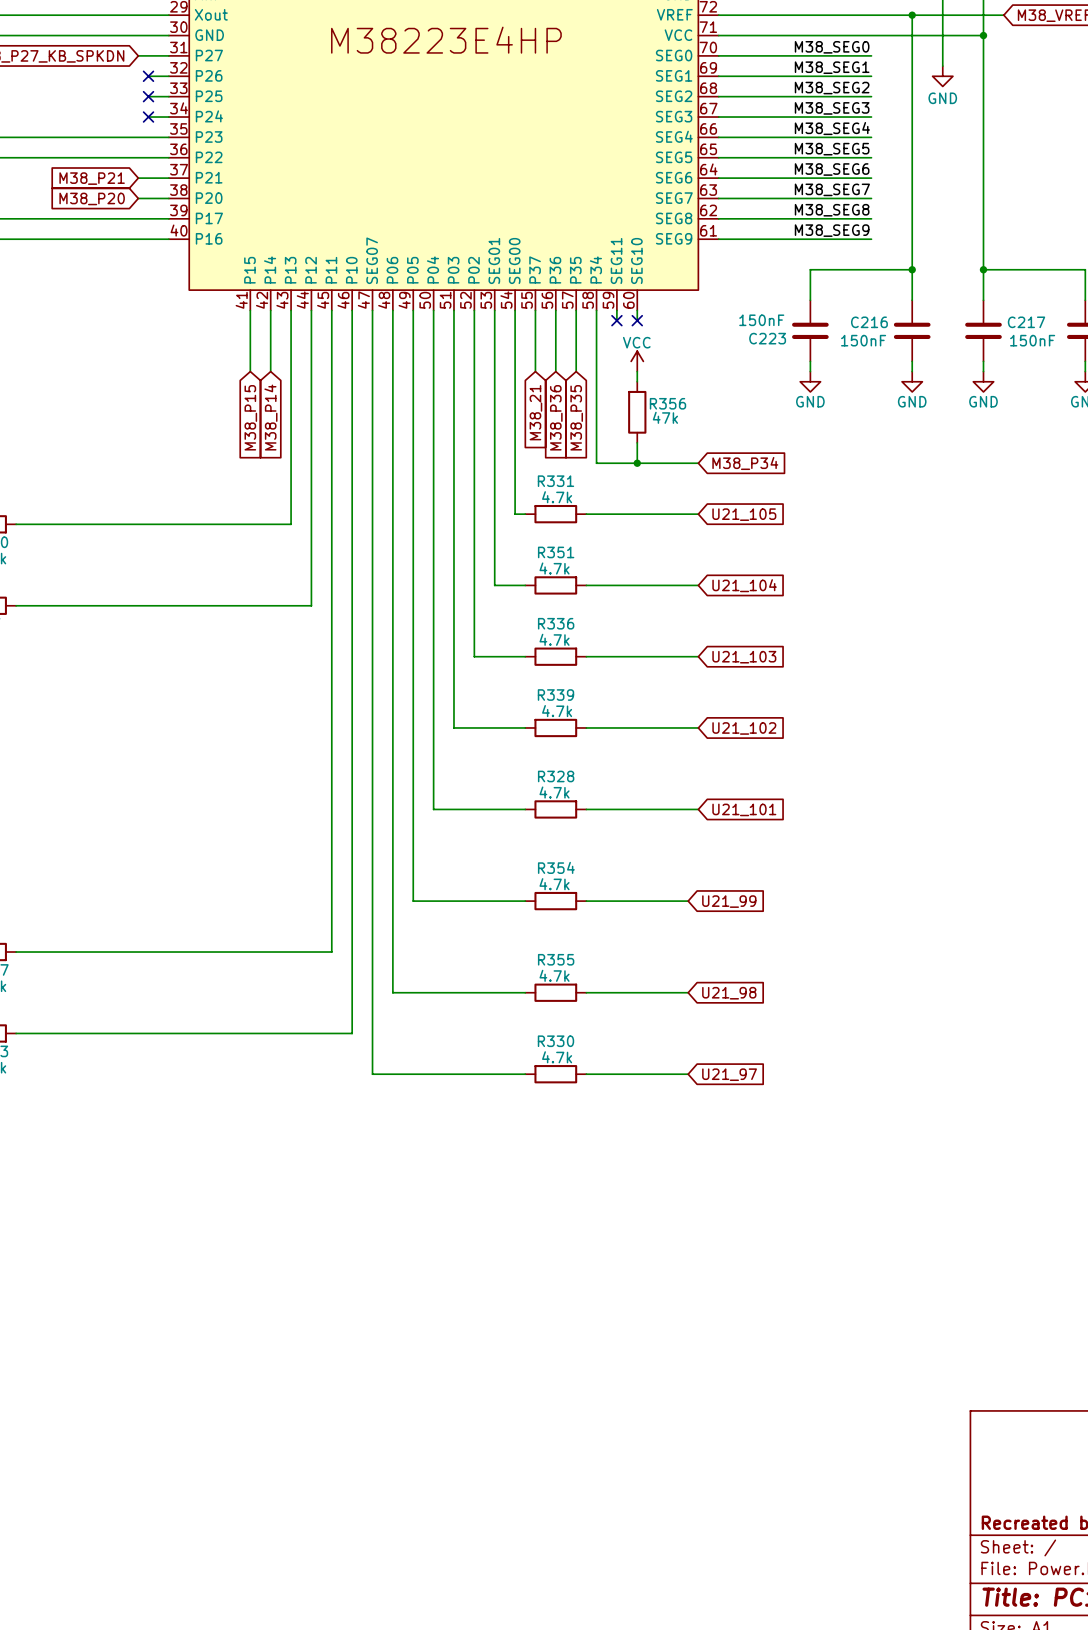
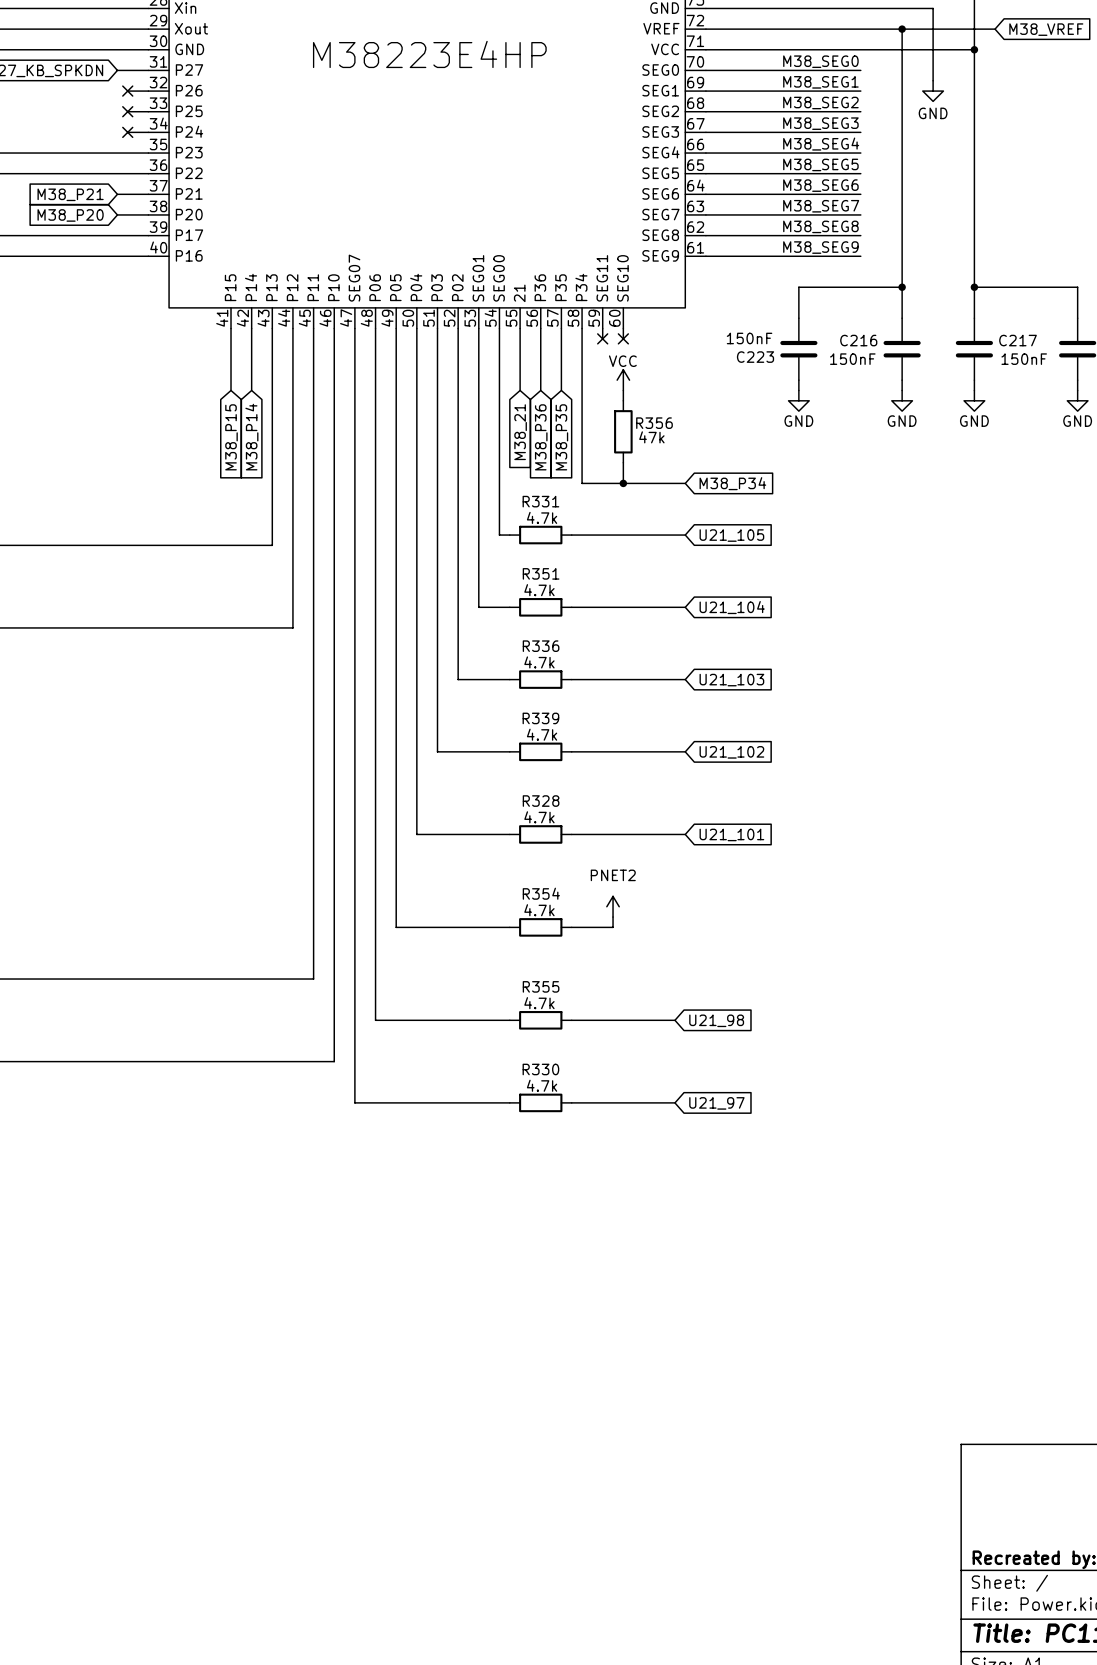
part pin name: P37 (535, 269) -> 21 (519, 293)
power symbol: none -> PNET2 (613, 906)
wire: (627, 901) (688, 901) -> (613, 927) (613, 917)
global label: U21_99 (729, 901) -> none

